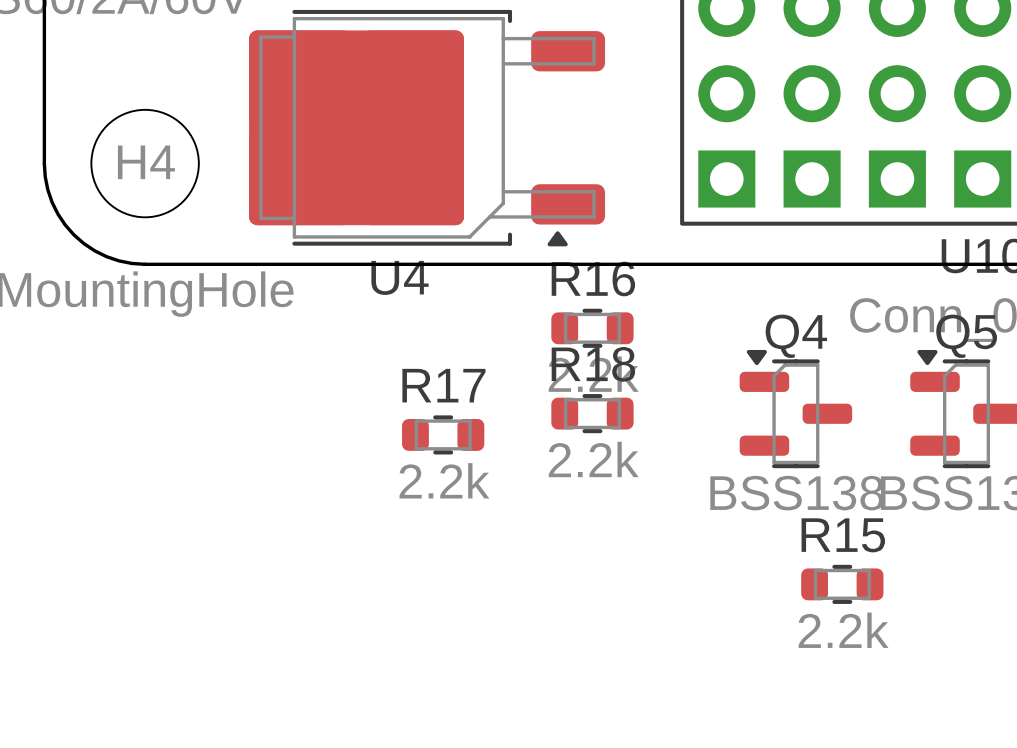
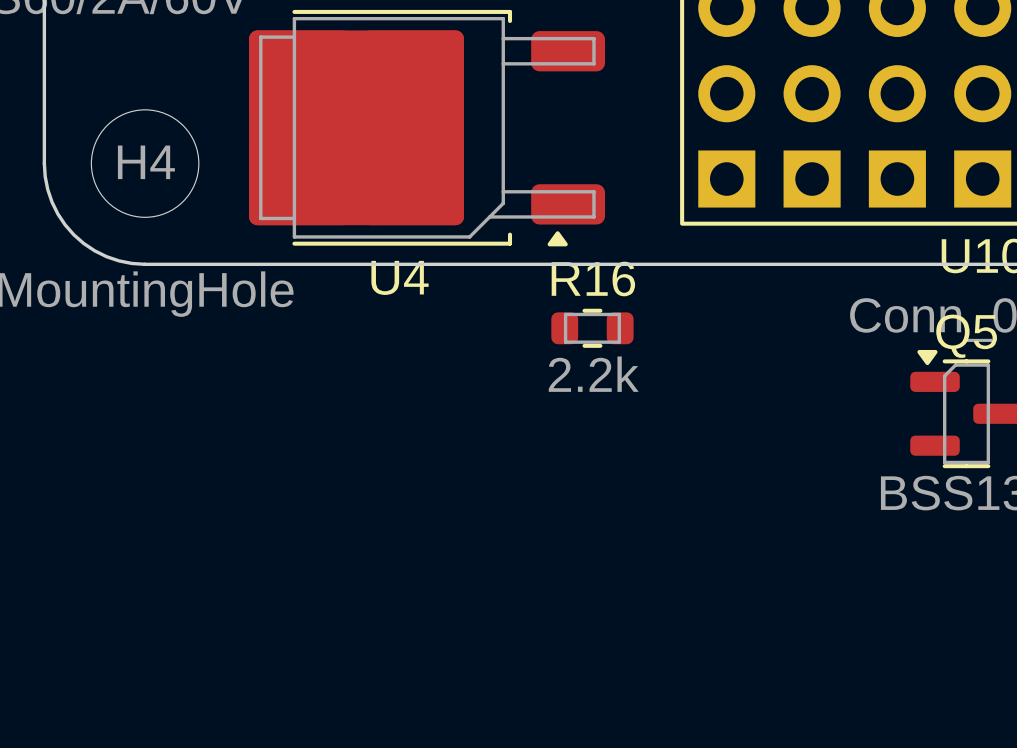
Q4: BSS138 (795, 409) -> none
R18: 2.2k (592, 413) -> none
R17: 2.2k (443, 434) -> none
R15: 2.2k (842, 584) -> none

